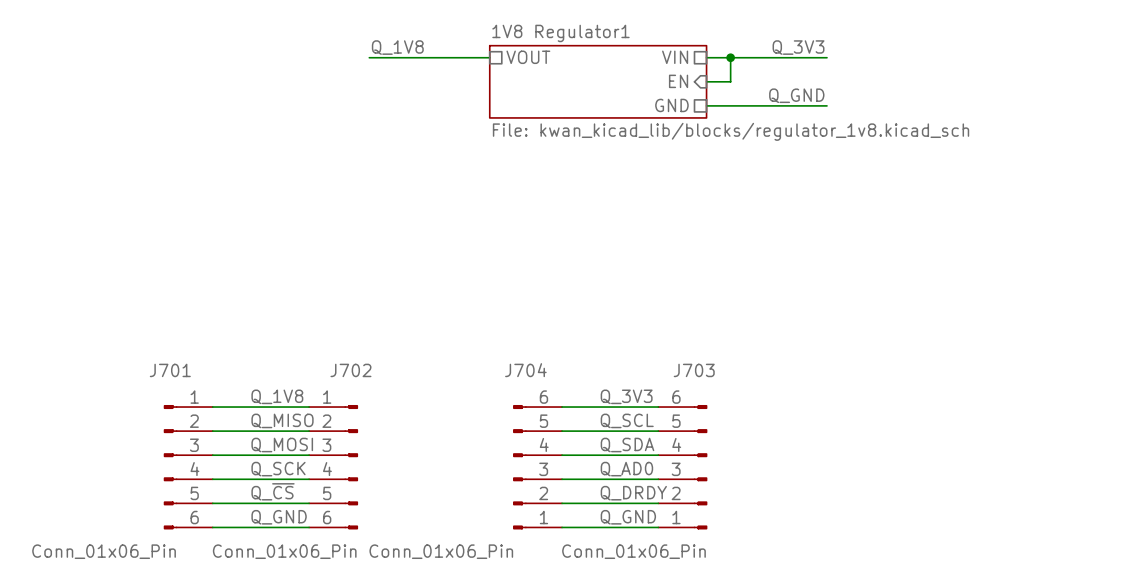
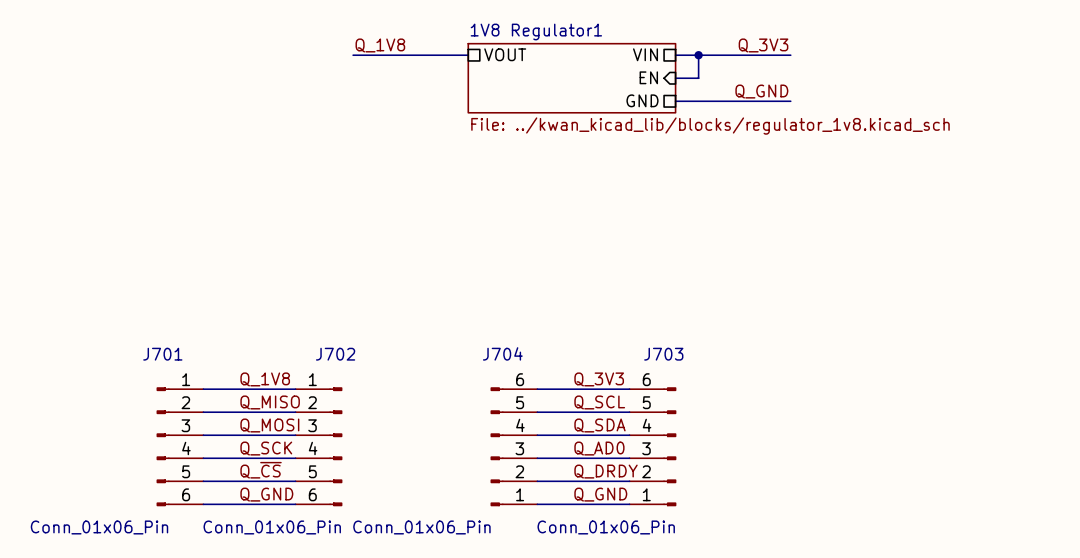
sheet 1V8 Regulator1 value: File: kwan_kicad_lib/blocks/regulator_1v8.kicad_sch (731, 131) -> File: ../kwan_kicad_lib/blocks/regulator_1v8.kicad_sch (710, 126)

